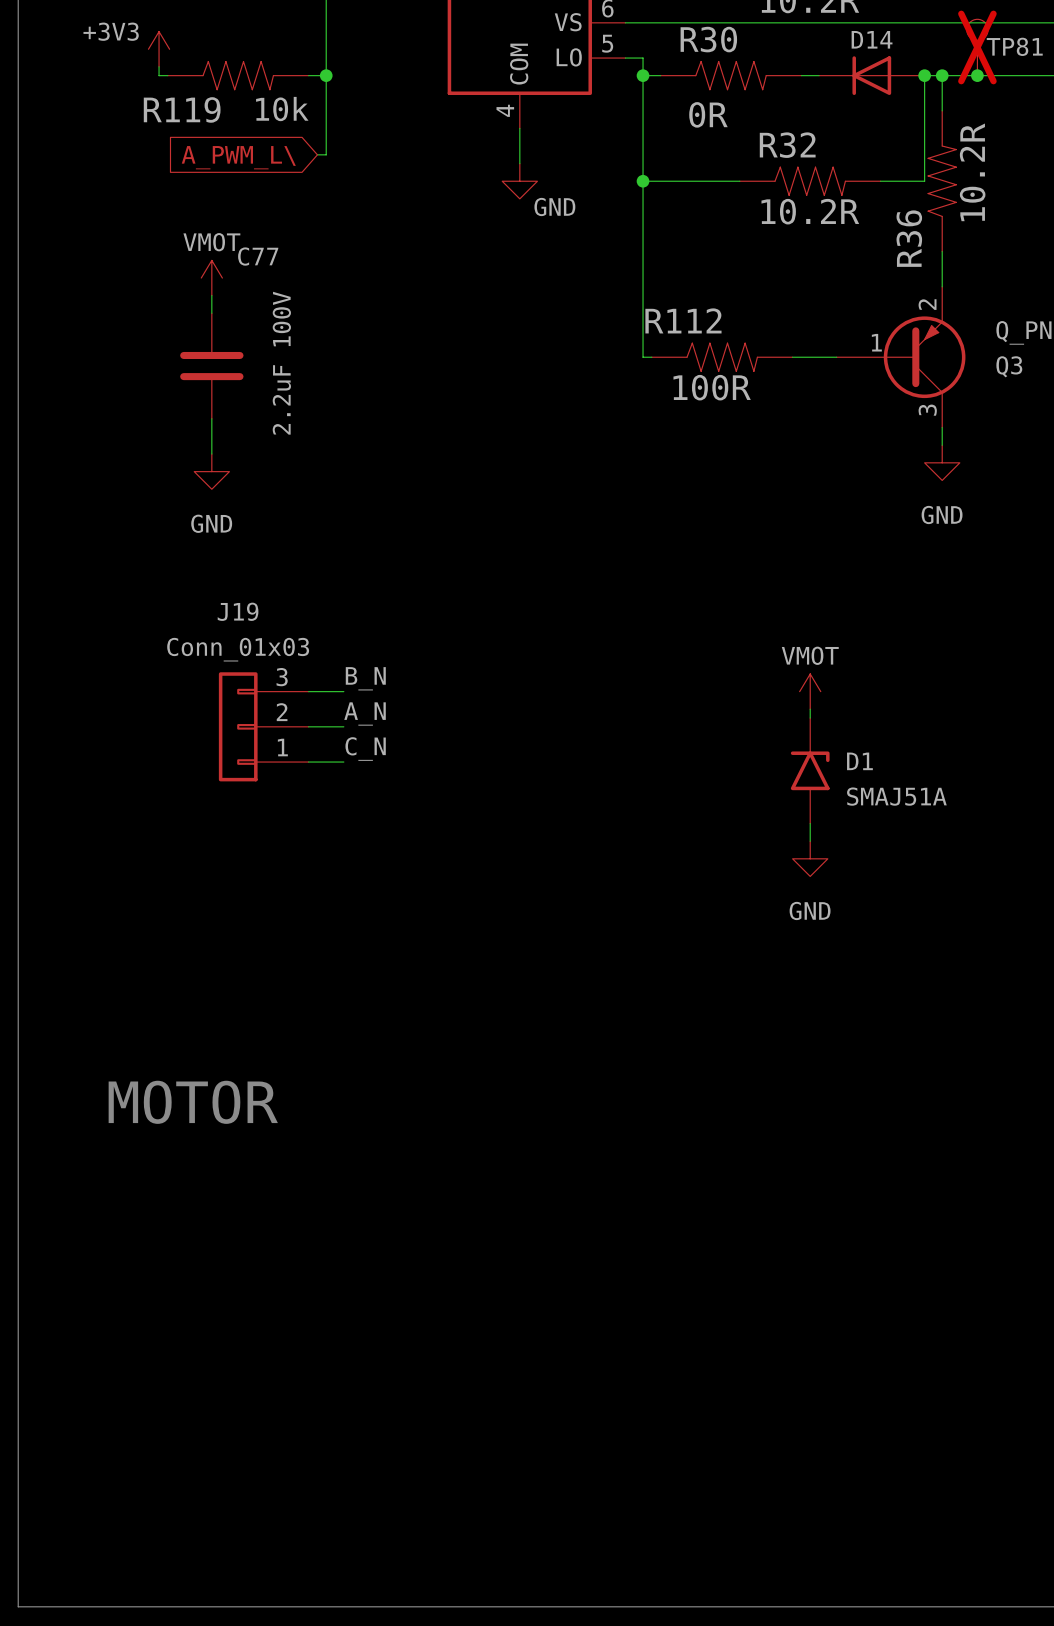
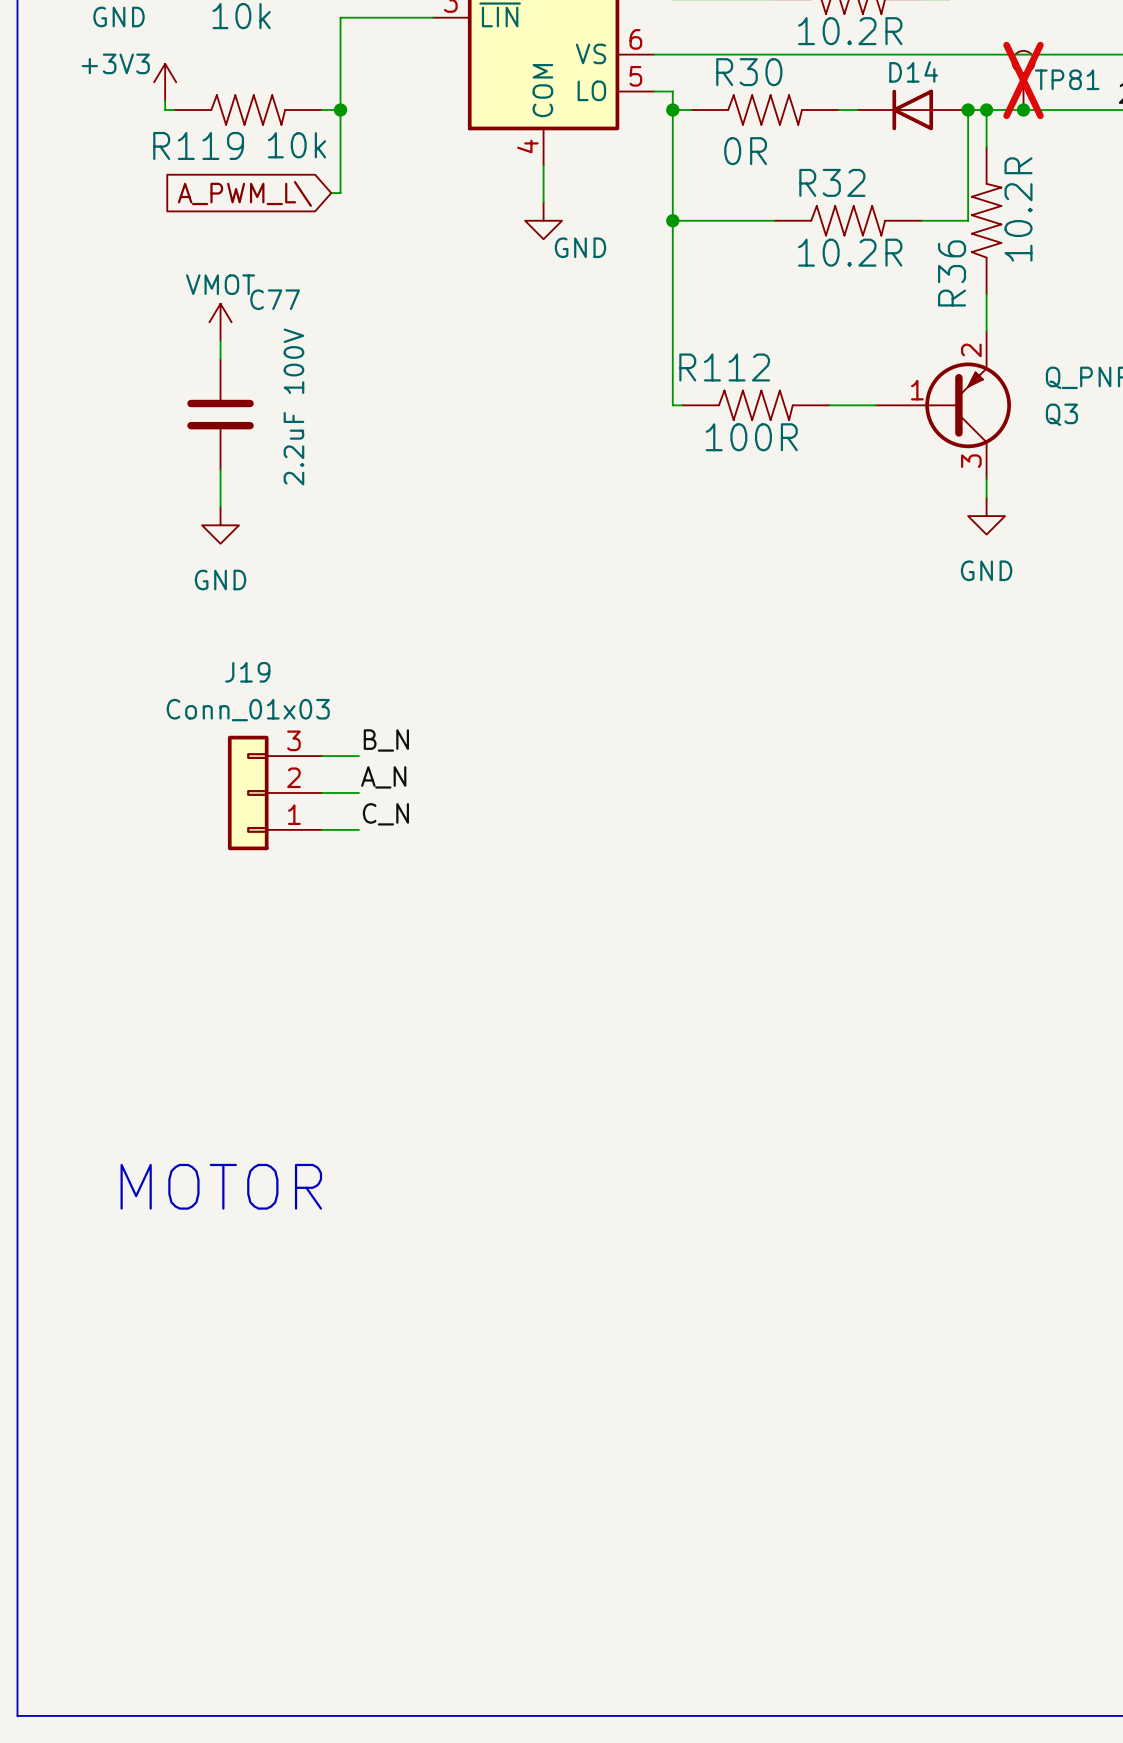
power symbol: VMOT (810, 691) -> none
wire: (810, 709) (810, 718) -> none
D1: SMAJ51A (810, 770) -> none
wire: (810, 823) (810, 841) -> none
power symbol: GND (810, 858) -> none

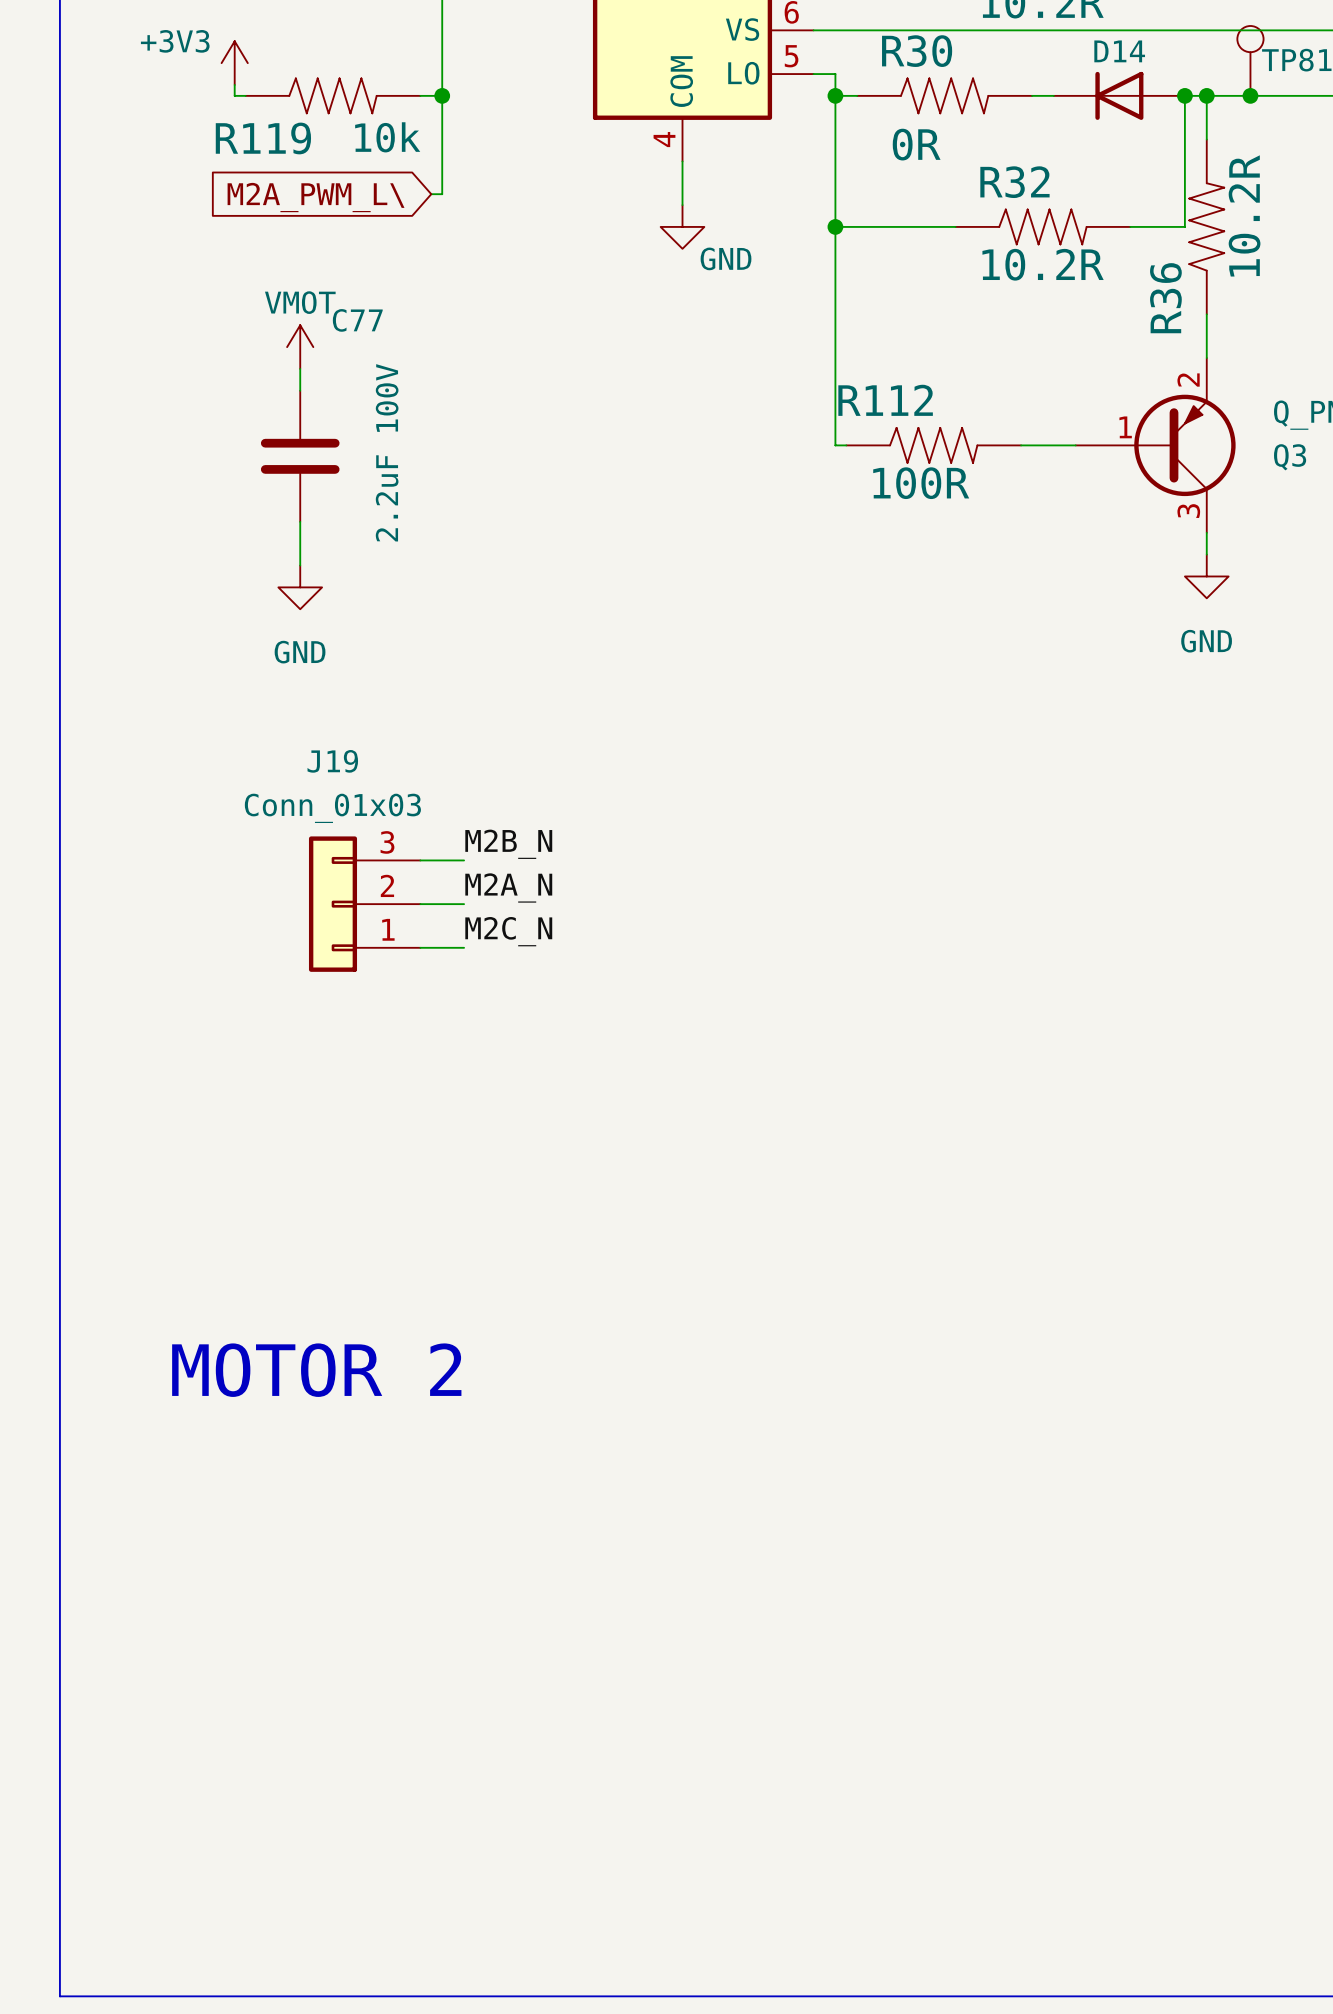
TP81 do-not-place cross: (1023, 80) -> none
global label: A_PWM_L\ (244, 193) -> M2A_PWM_L\ (316, 197)
label: B_N (386, 740) -> M2B_N (508, 844)
label: A_N (383, 777) -> M2A_N (508, 887)
label: C_N (385, 814) -> M2C_N (508, 931)
text: MOTOR (221, 1186) -> MOTOR 2 (316, 1370)

